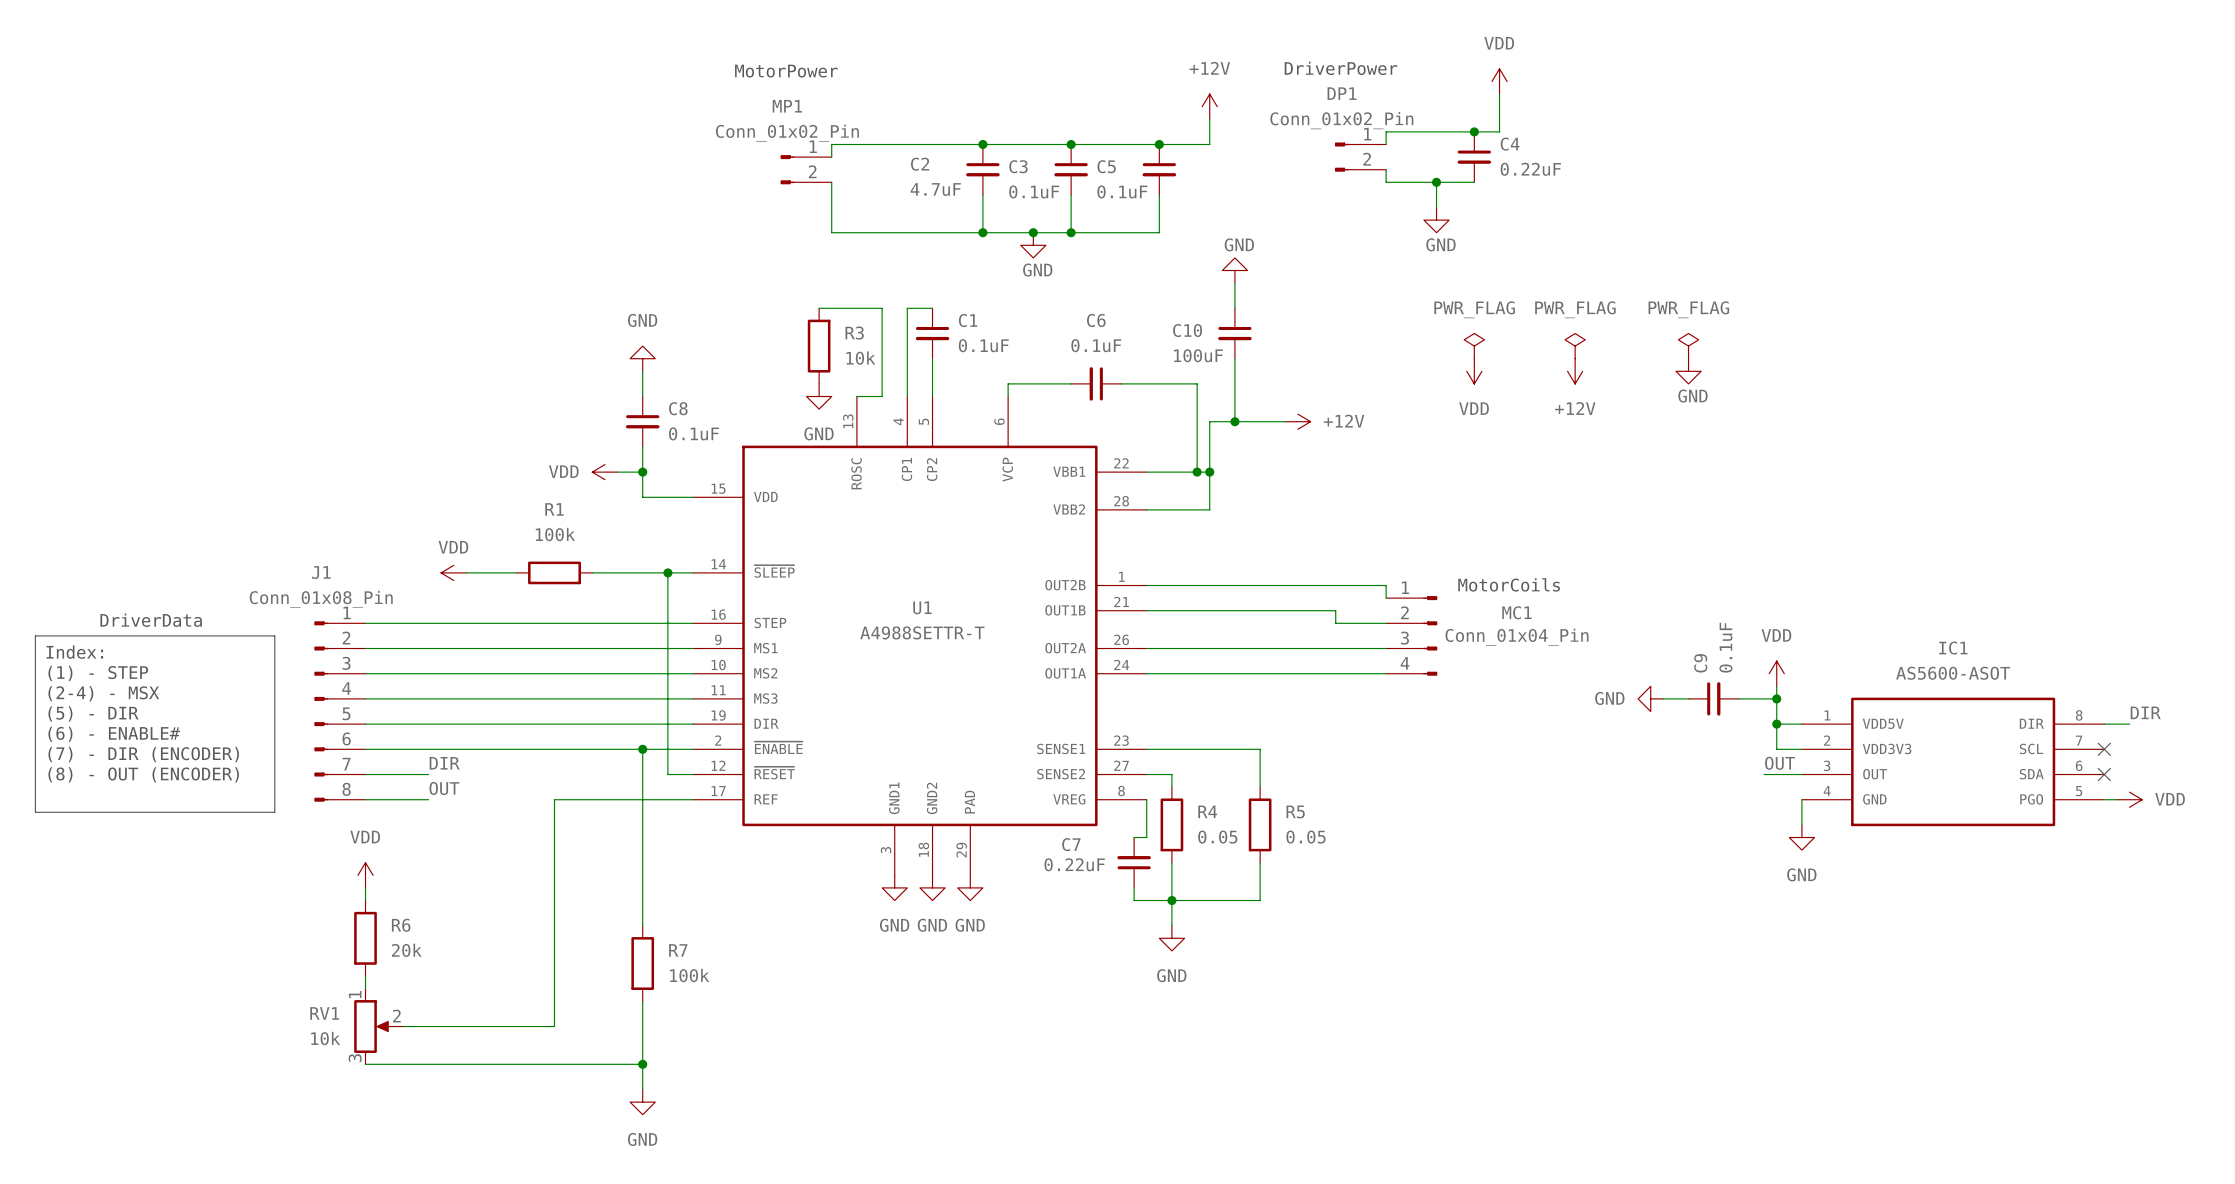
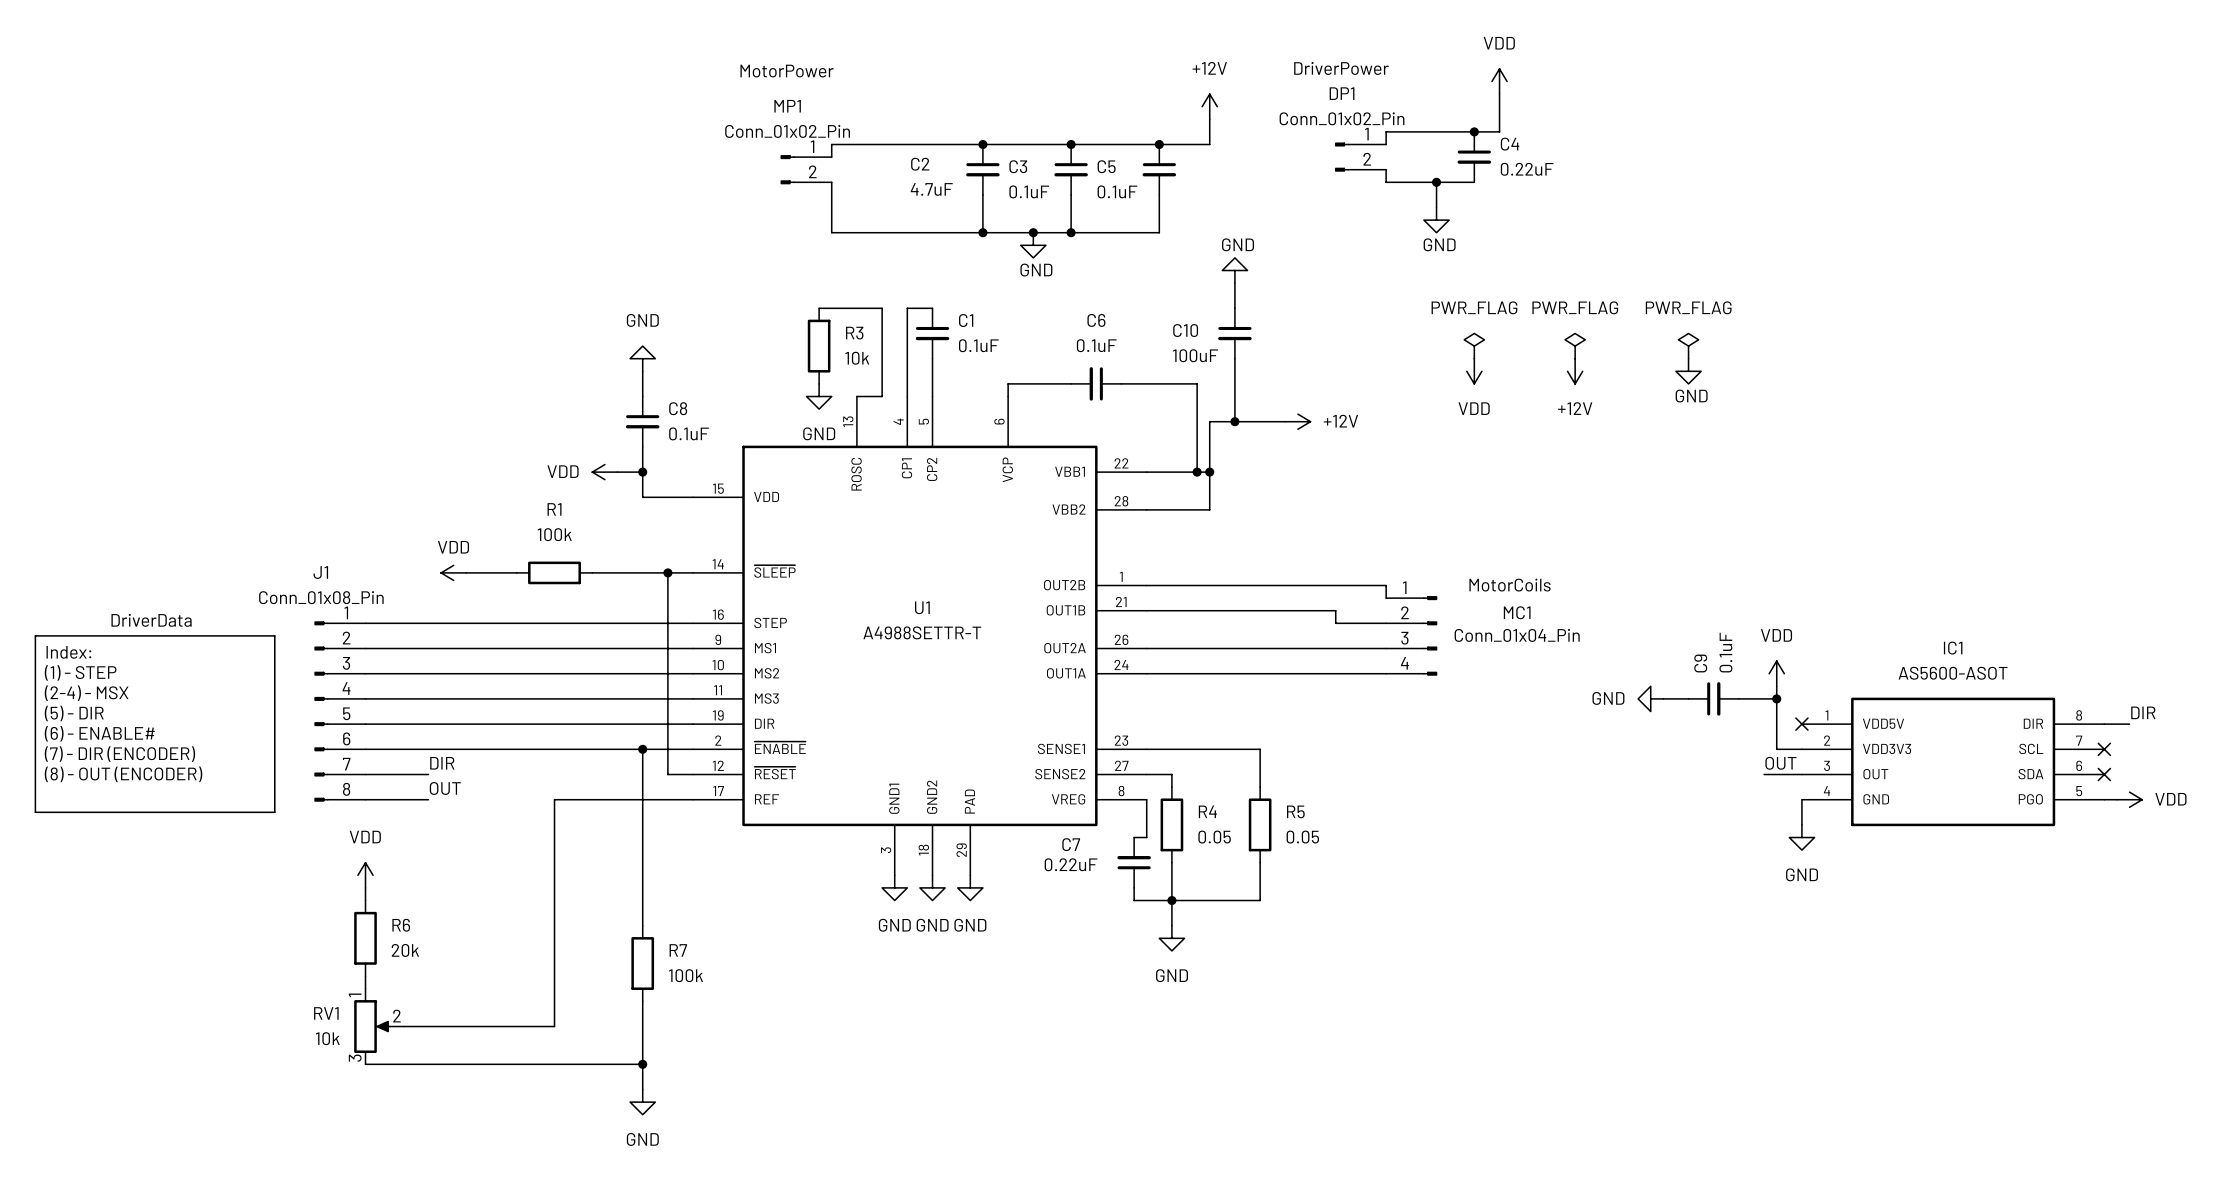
wire: (1776, 724) (1801, 724) -> none
junction: (1776, 724) -> none
no-connect mark: none -> (1801, 724)

